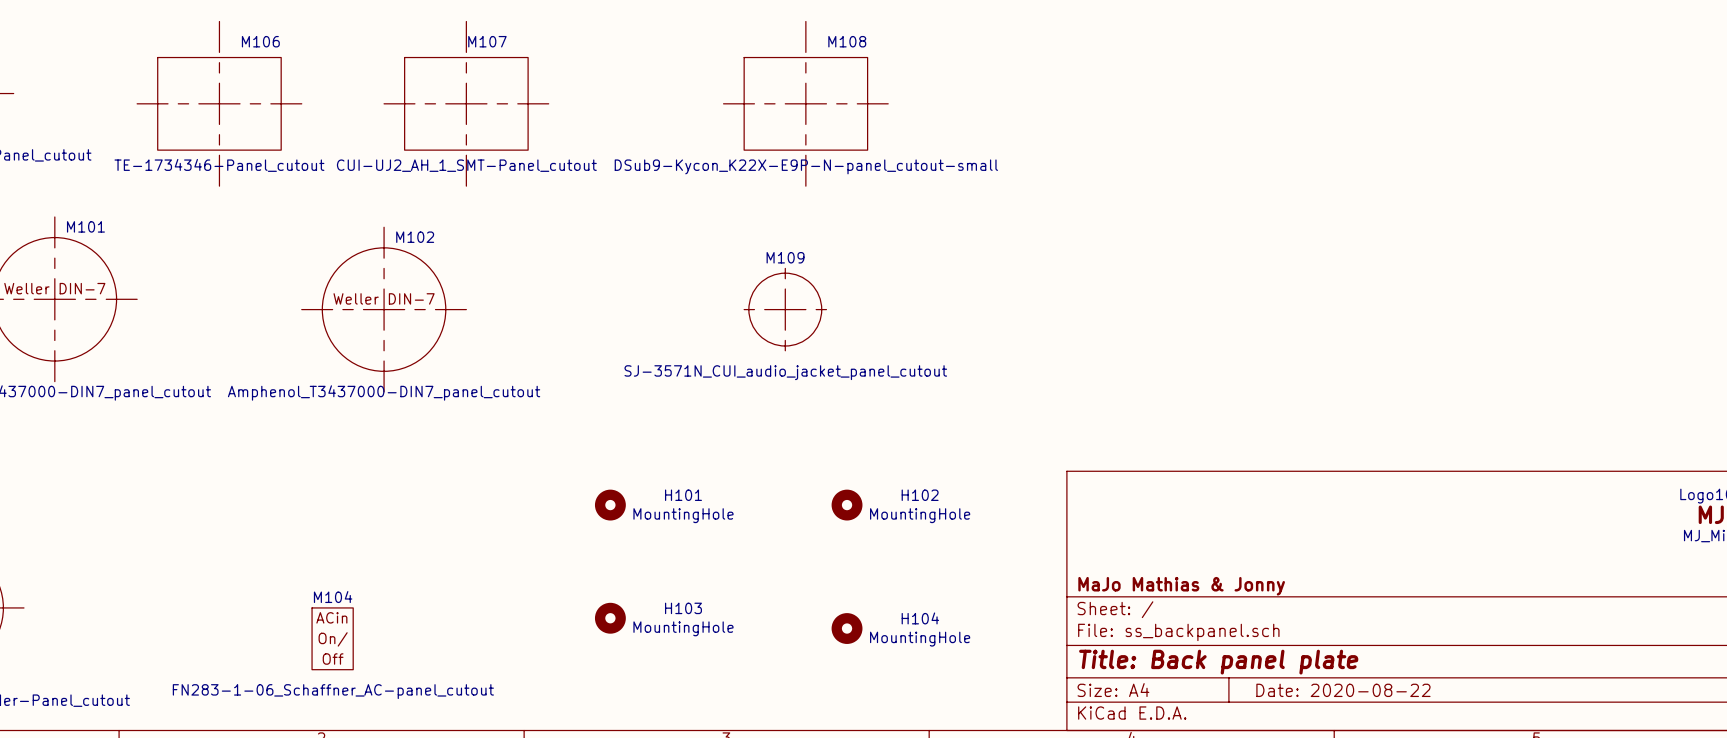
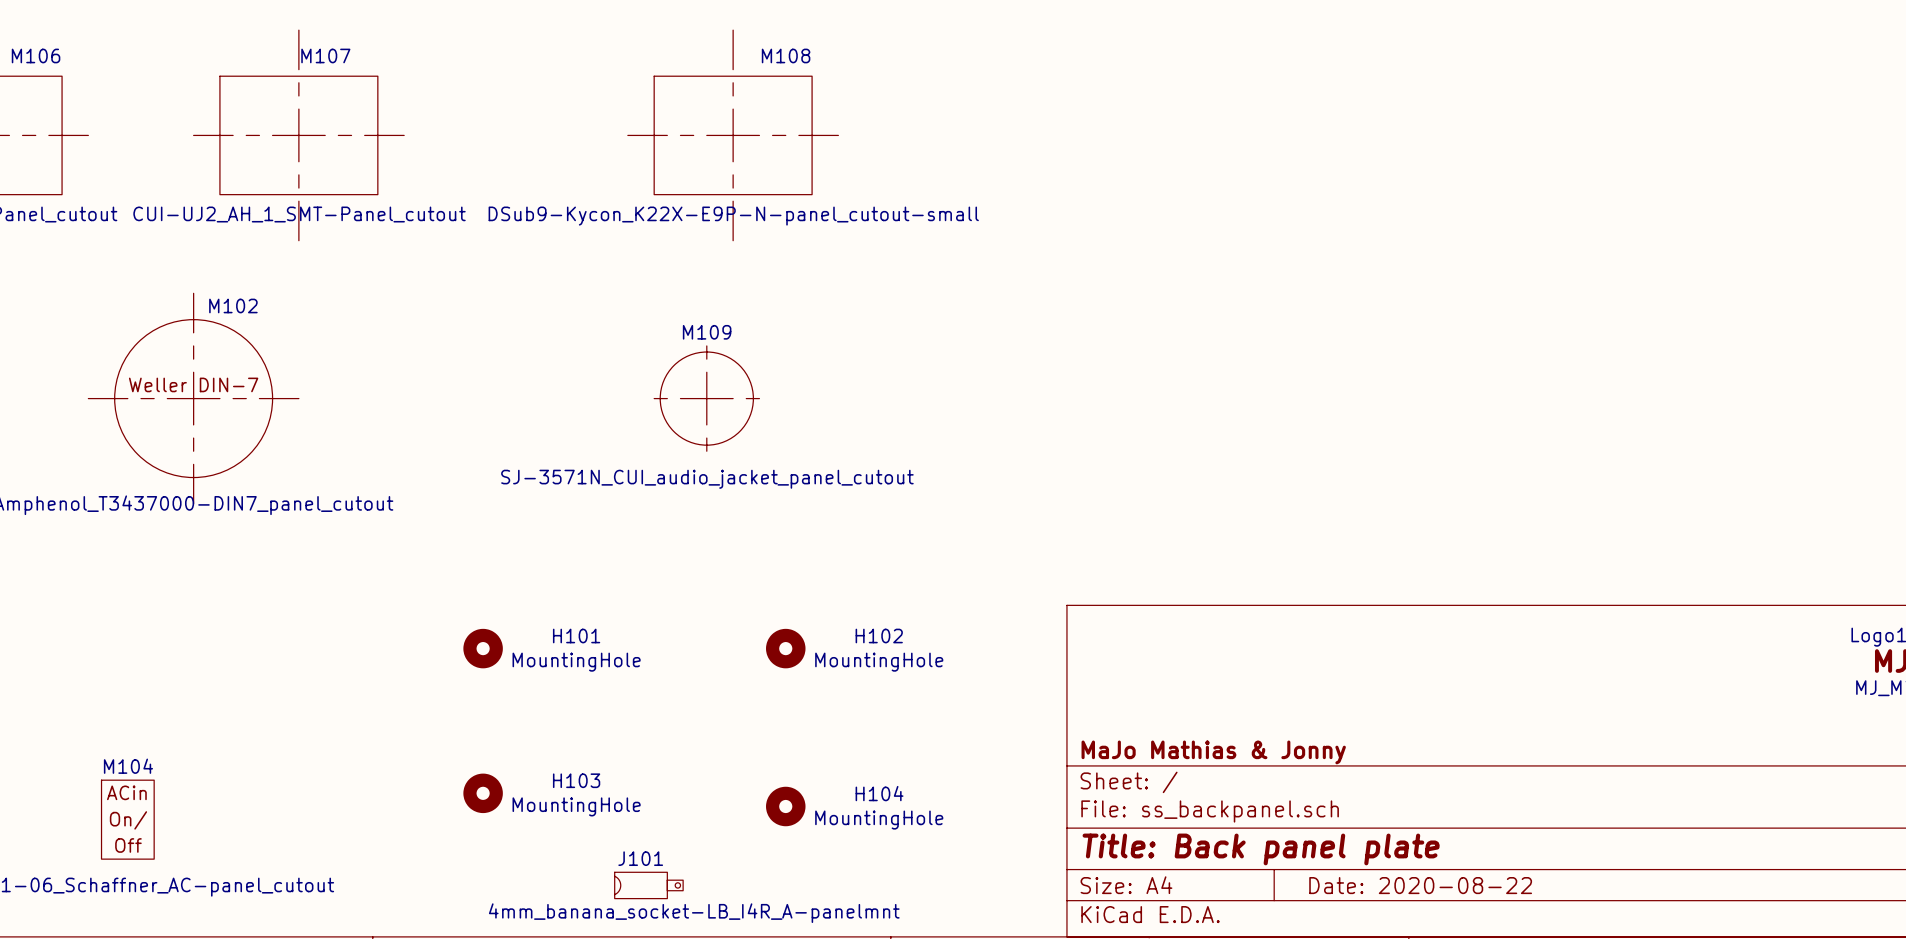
J101: none -> 4mm_banana_socket-LB_I4R_A-panelmnt (648, 885)

